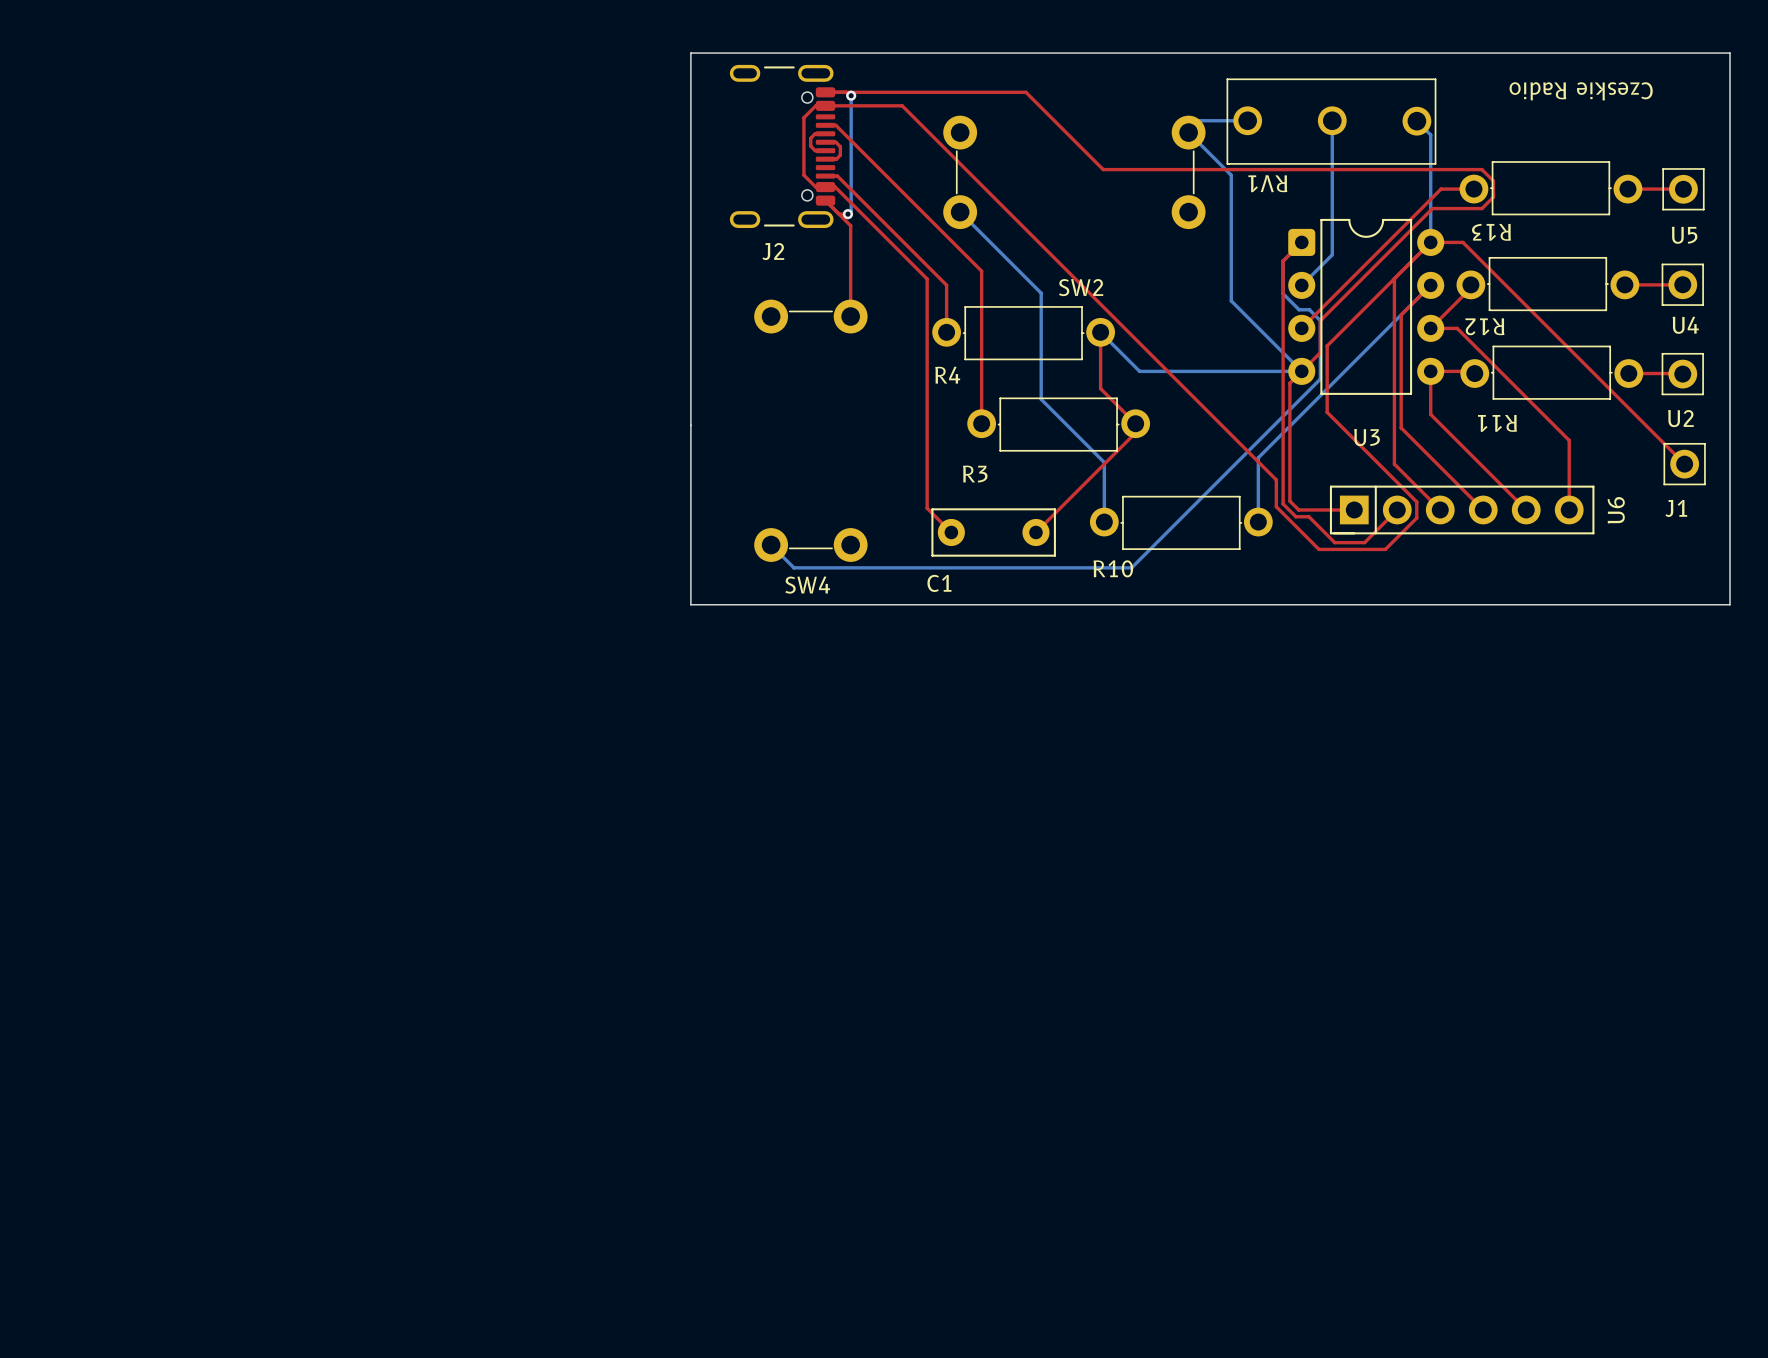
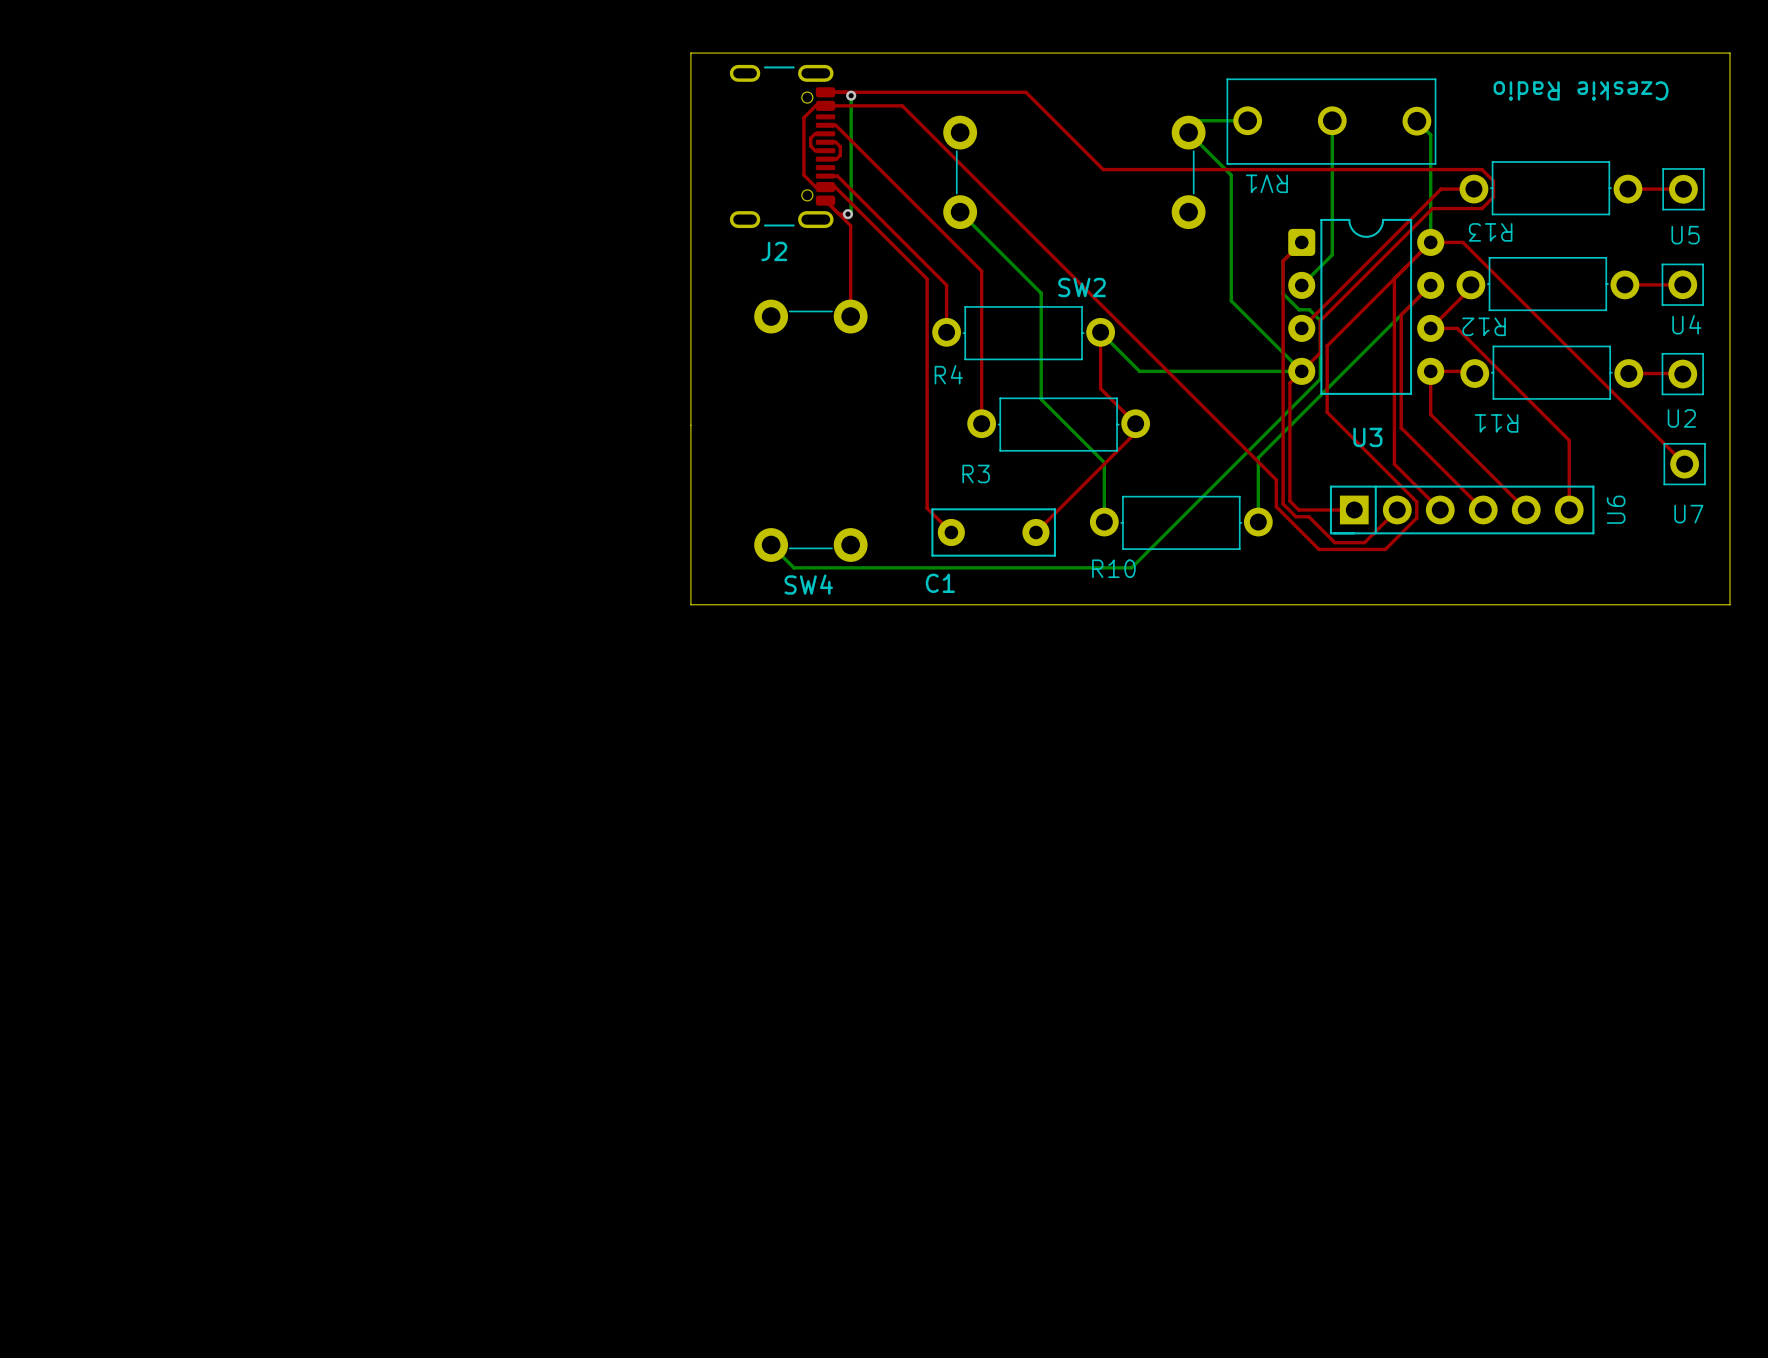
J1 name: J1 (1676, 508) -> U7 (1688, 514)

